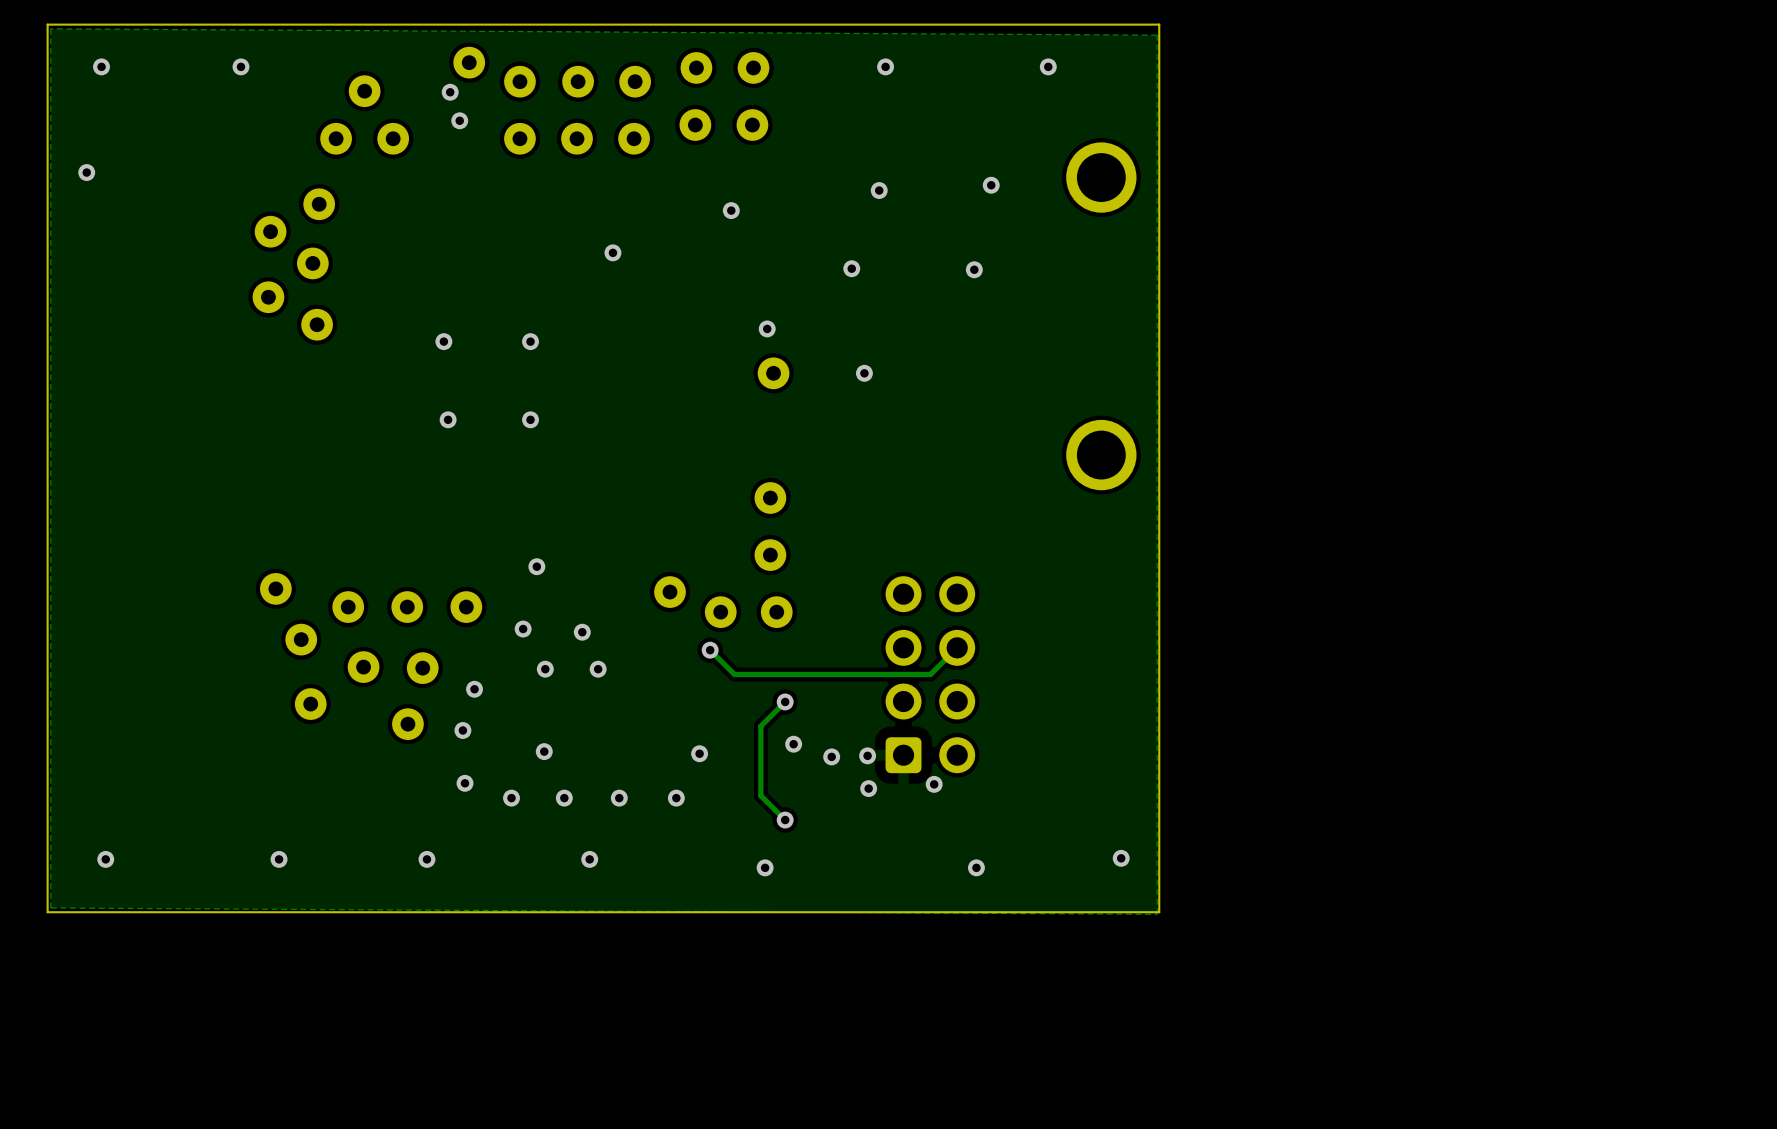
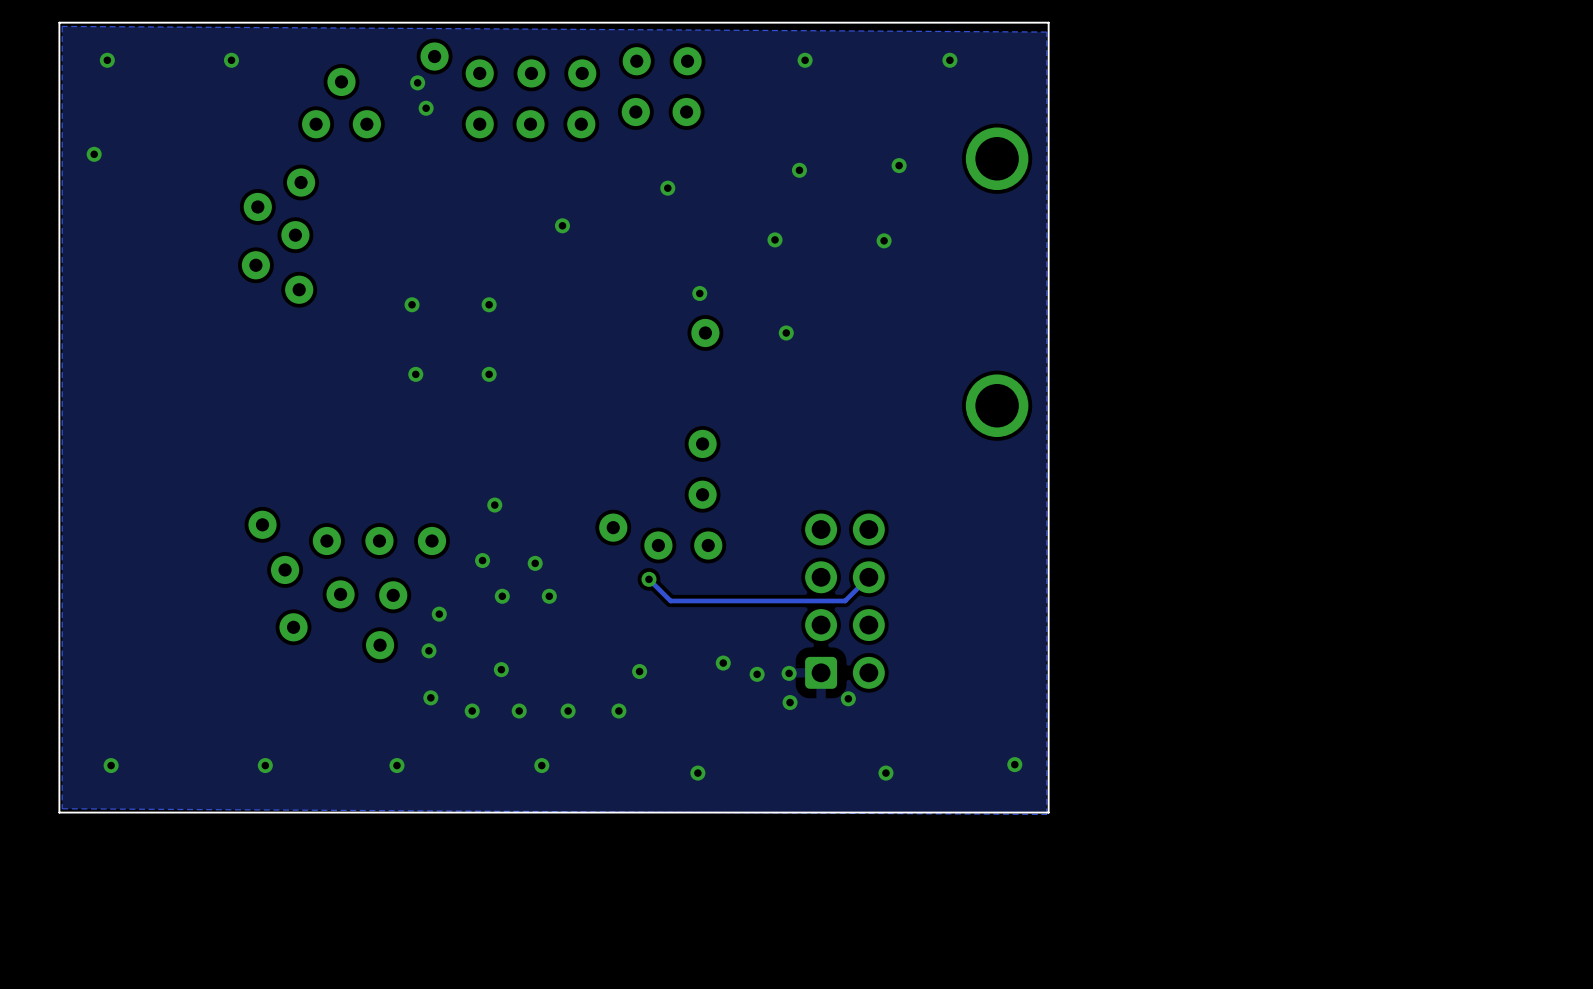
track: (785, 701) (760, 726) (760, 795) (785, 820) -> none
via: (785, 701) -> none
via: (785, 820) -> none

